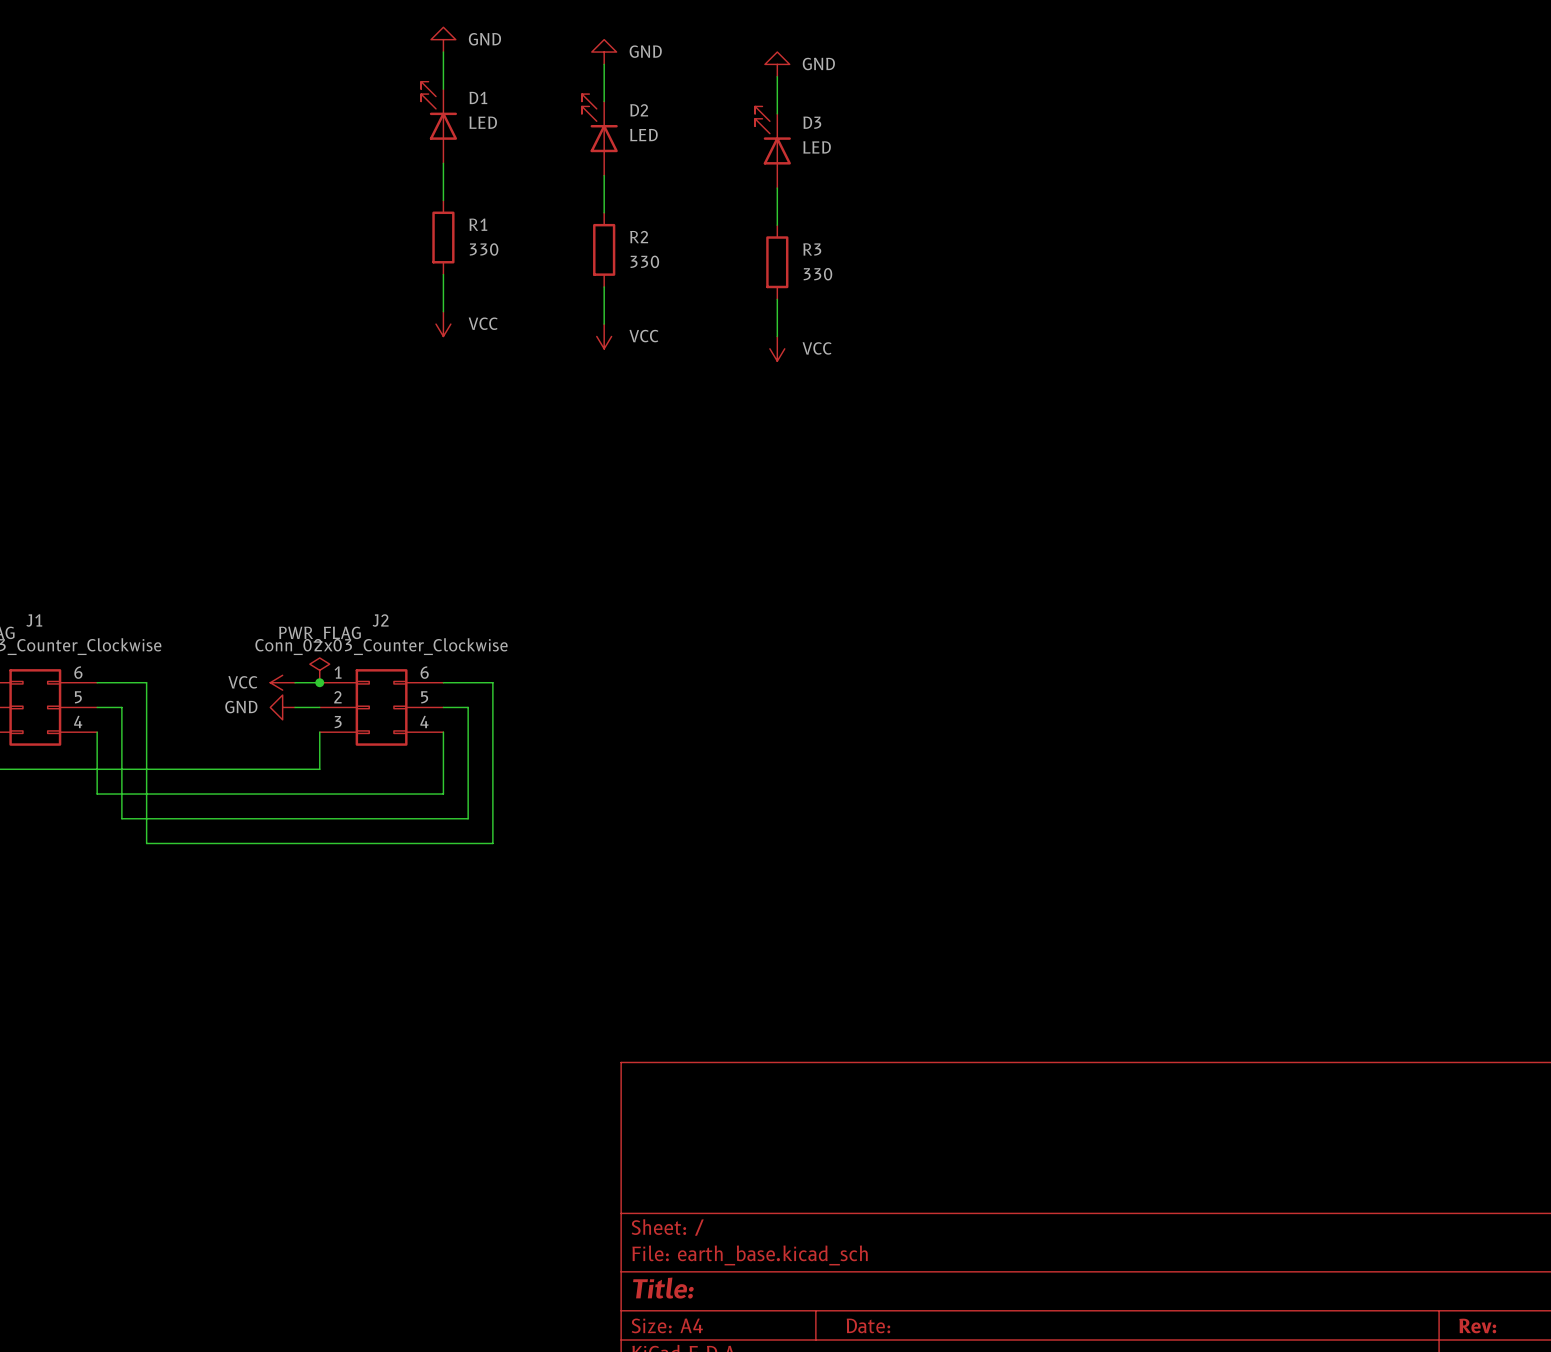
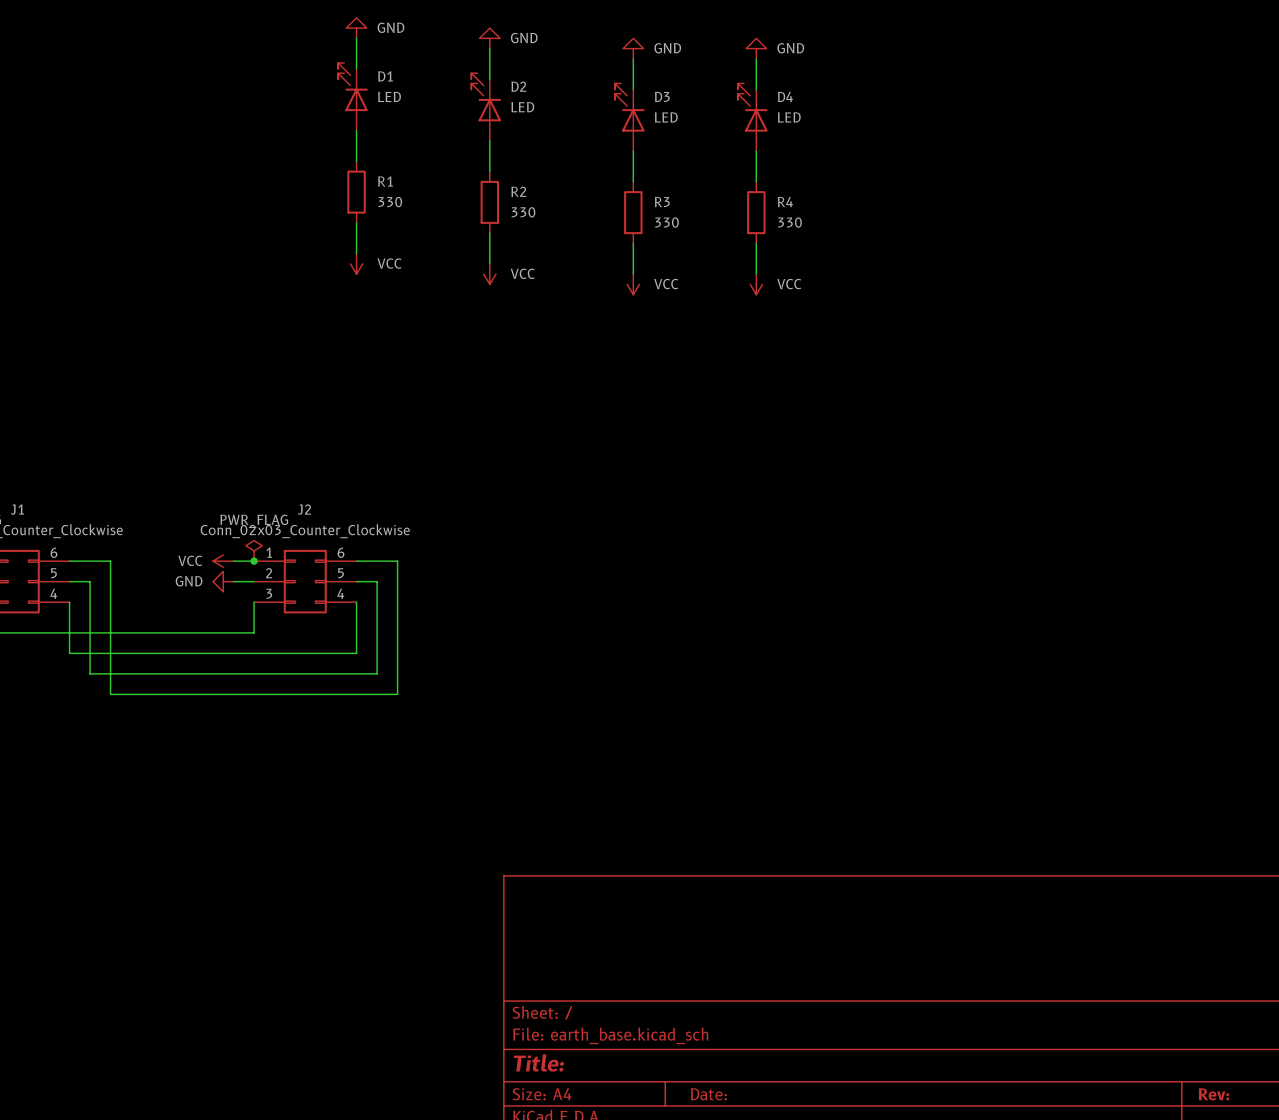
power symbol: none -> GND (756, 48)
wire: none -> (756, 58) (756, 89)
D4: none -> LED (752, 117)
wire: none -> (756, 151) (756, 181)
R4: none -> 330 (756, 212)
wire: none -> (756, 243) (756, 274)
power symbol: none -> VCC (756, 284)

